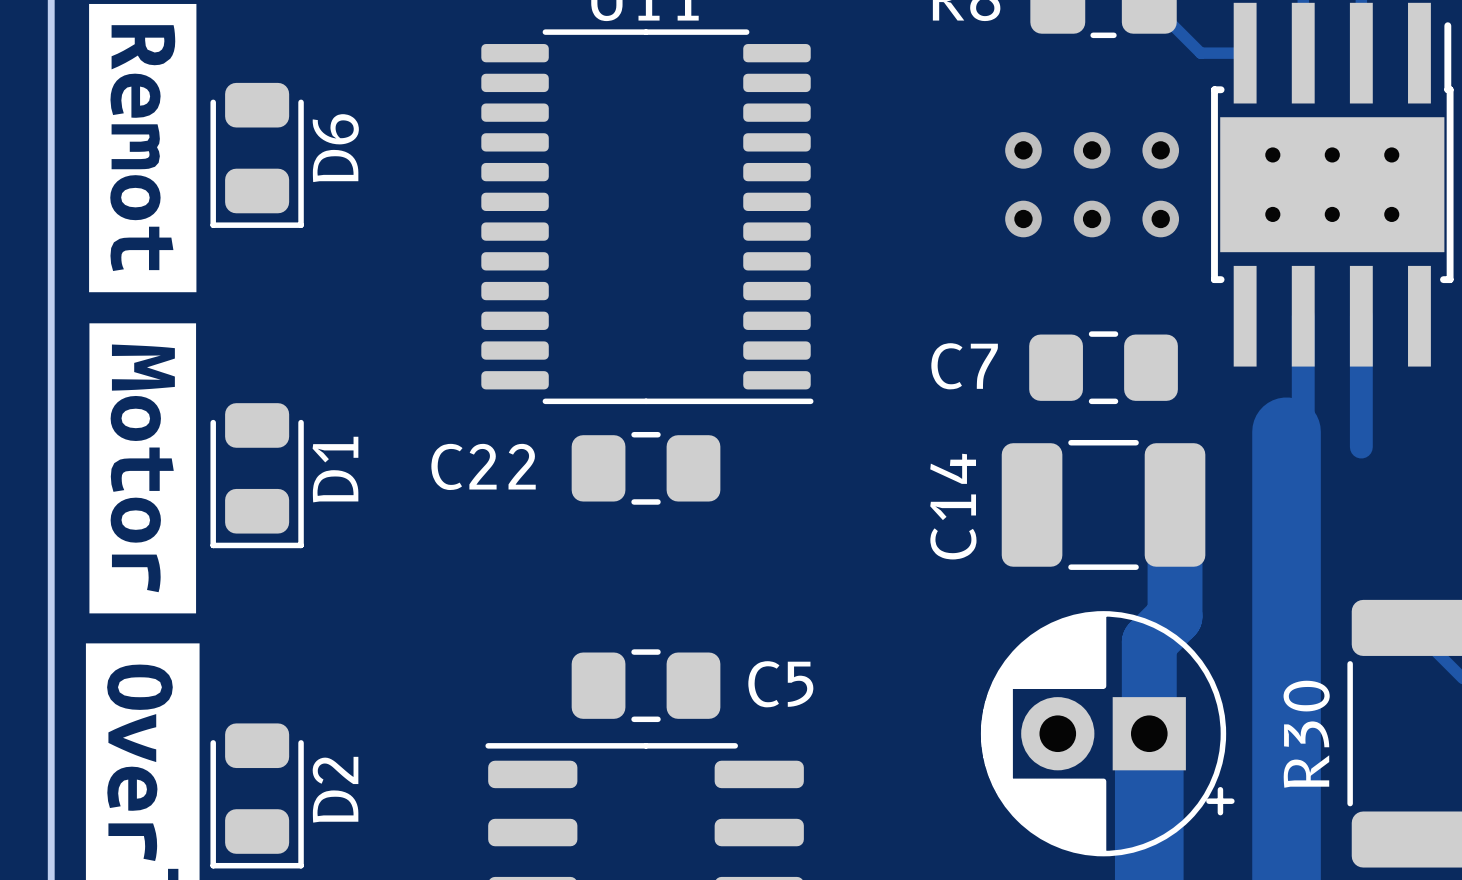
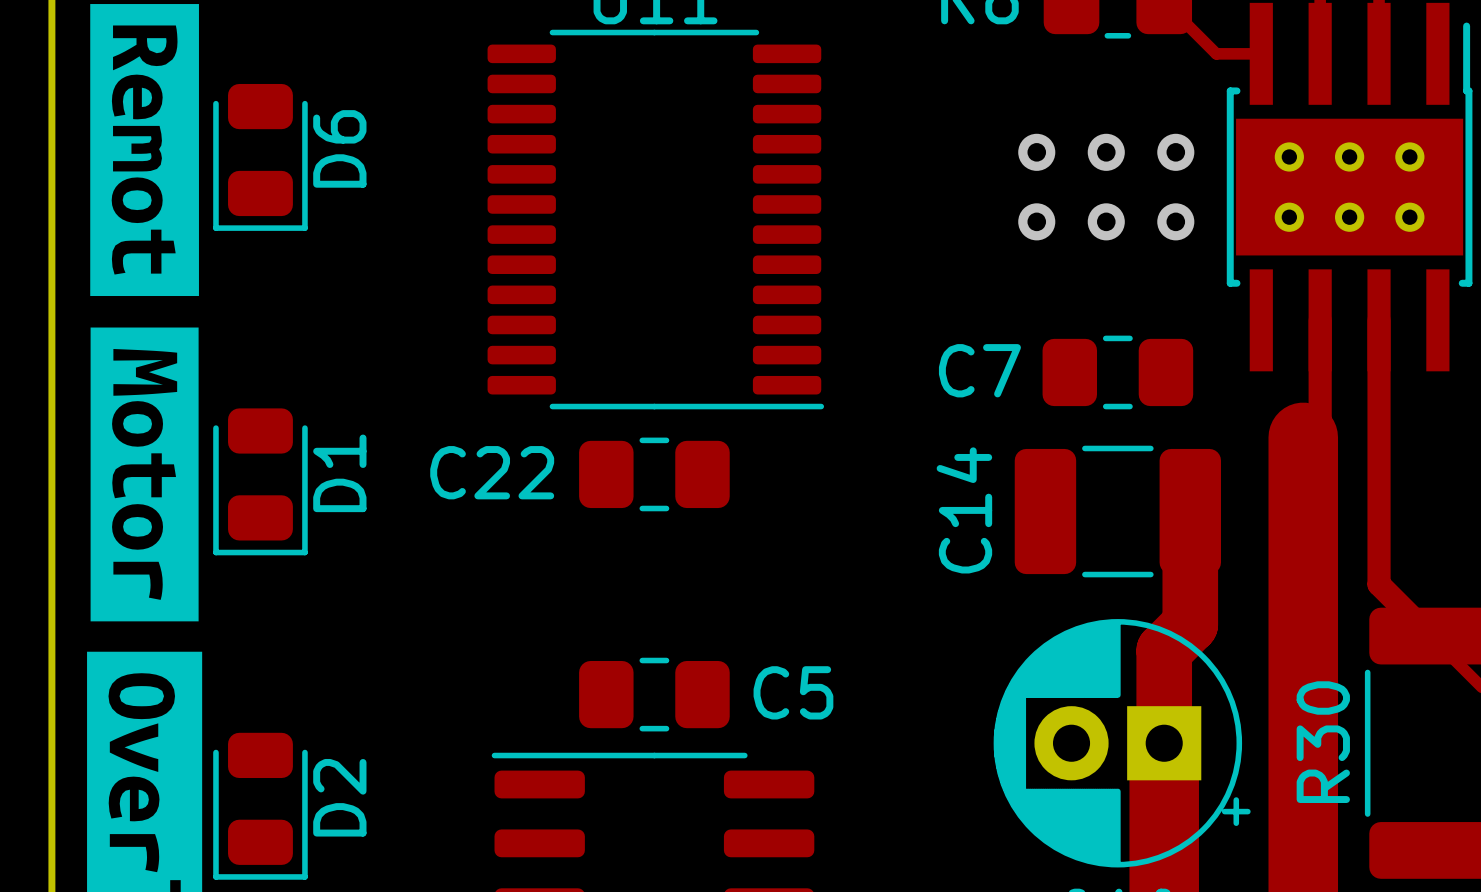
track: none -> (1379, 452) (1379, 584) (1430, 636)

